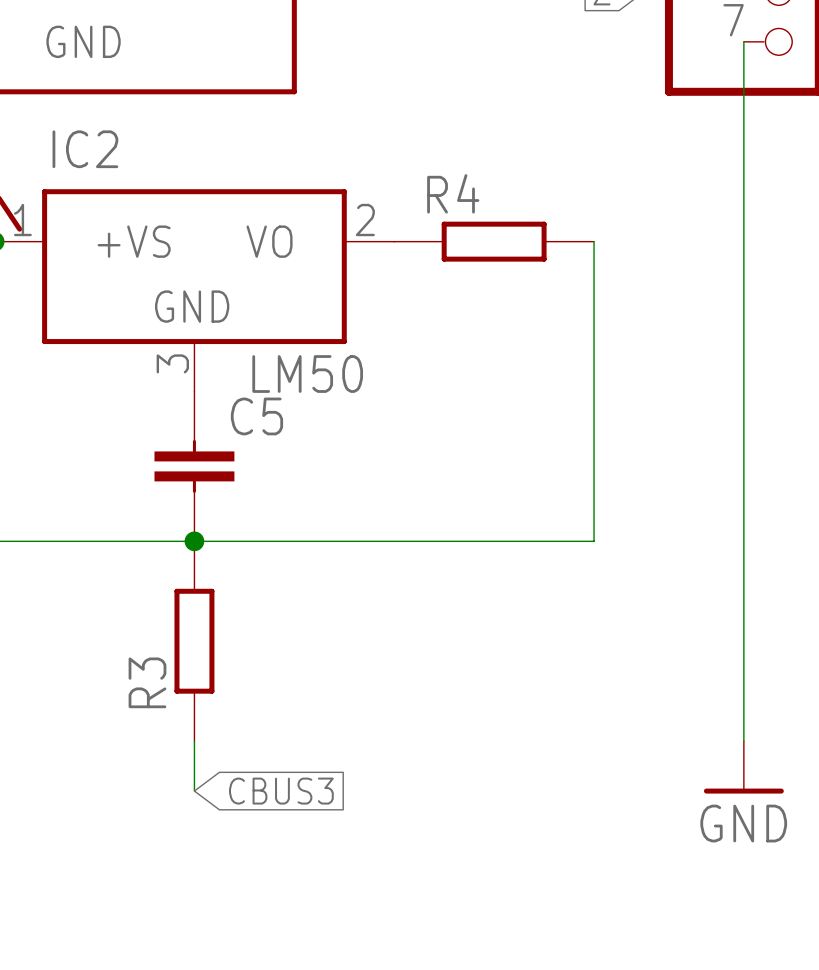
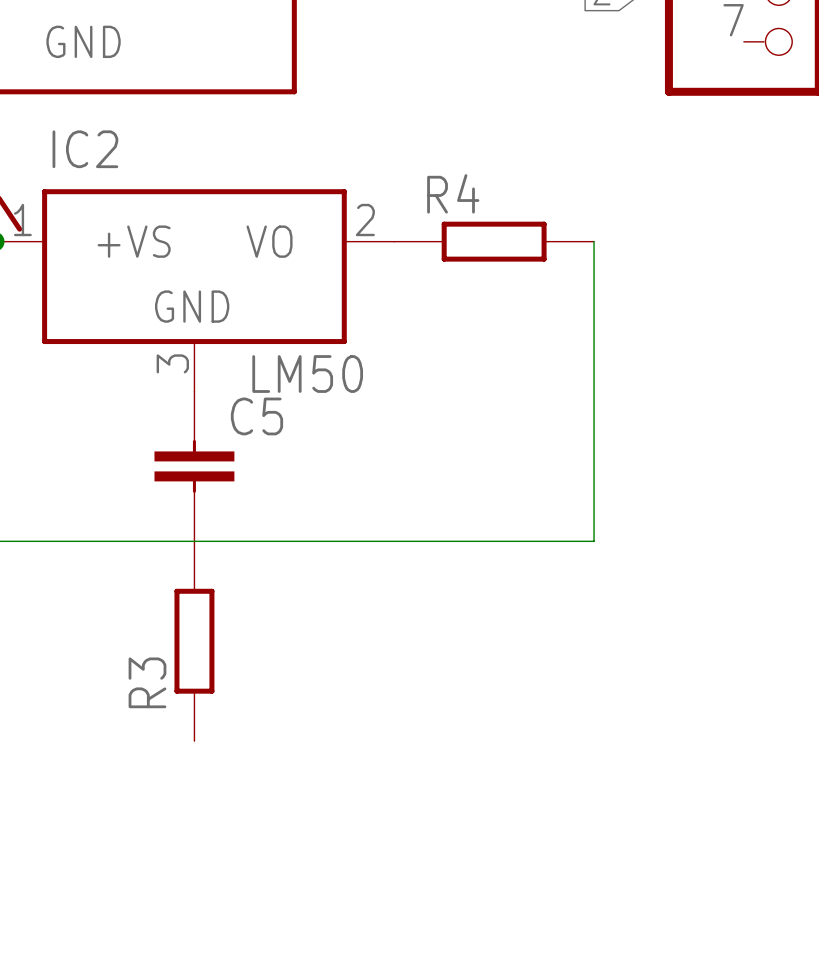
wire: (743, 41) (743, 741) -> none
junction: (194, 541) -> none
wire: (194, 741) (194, 791) -> none
power symbol: GND (743, 767) -> none
global label: CBUS3 (281, 791) -> none

